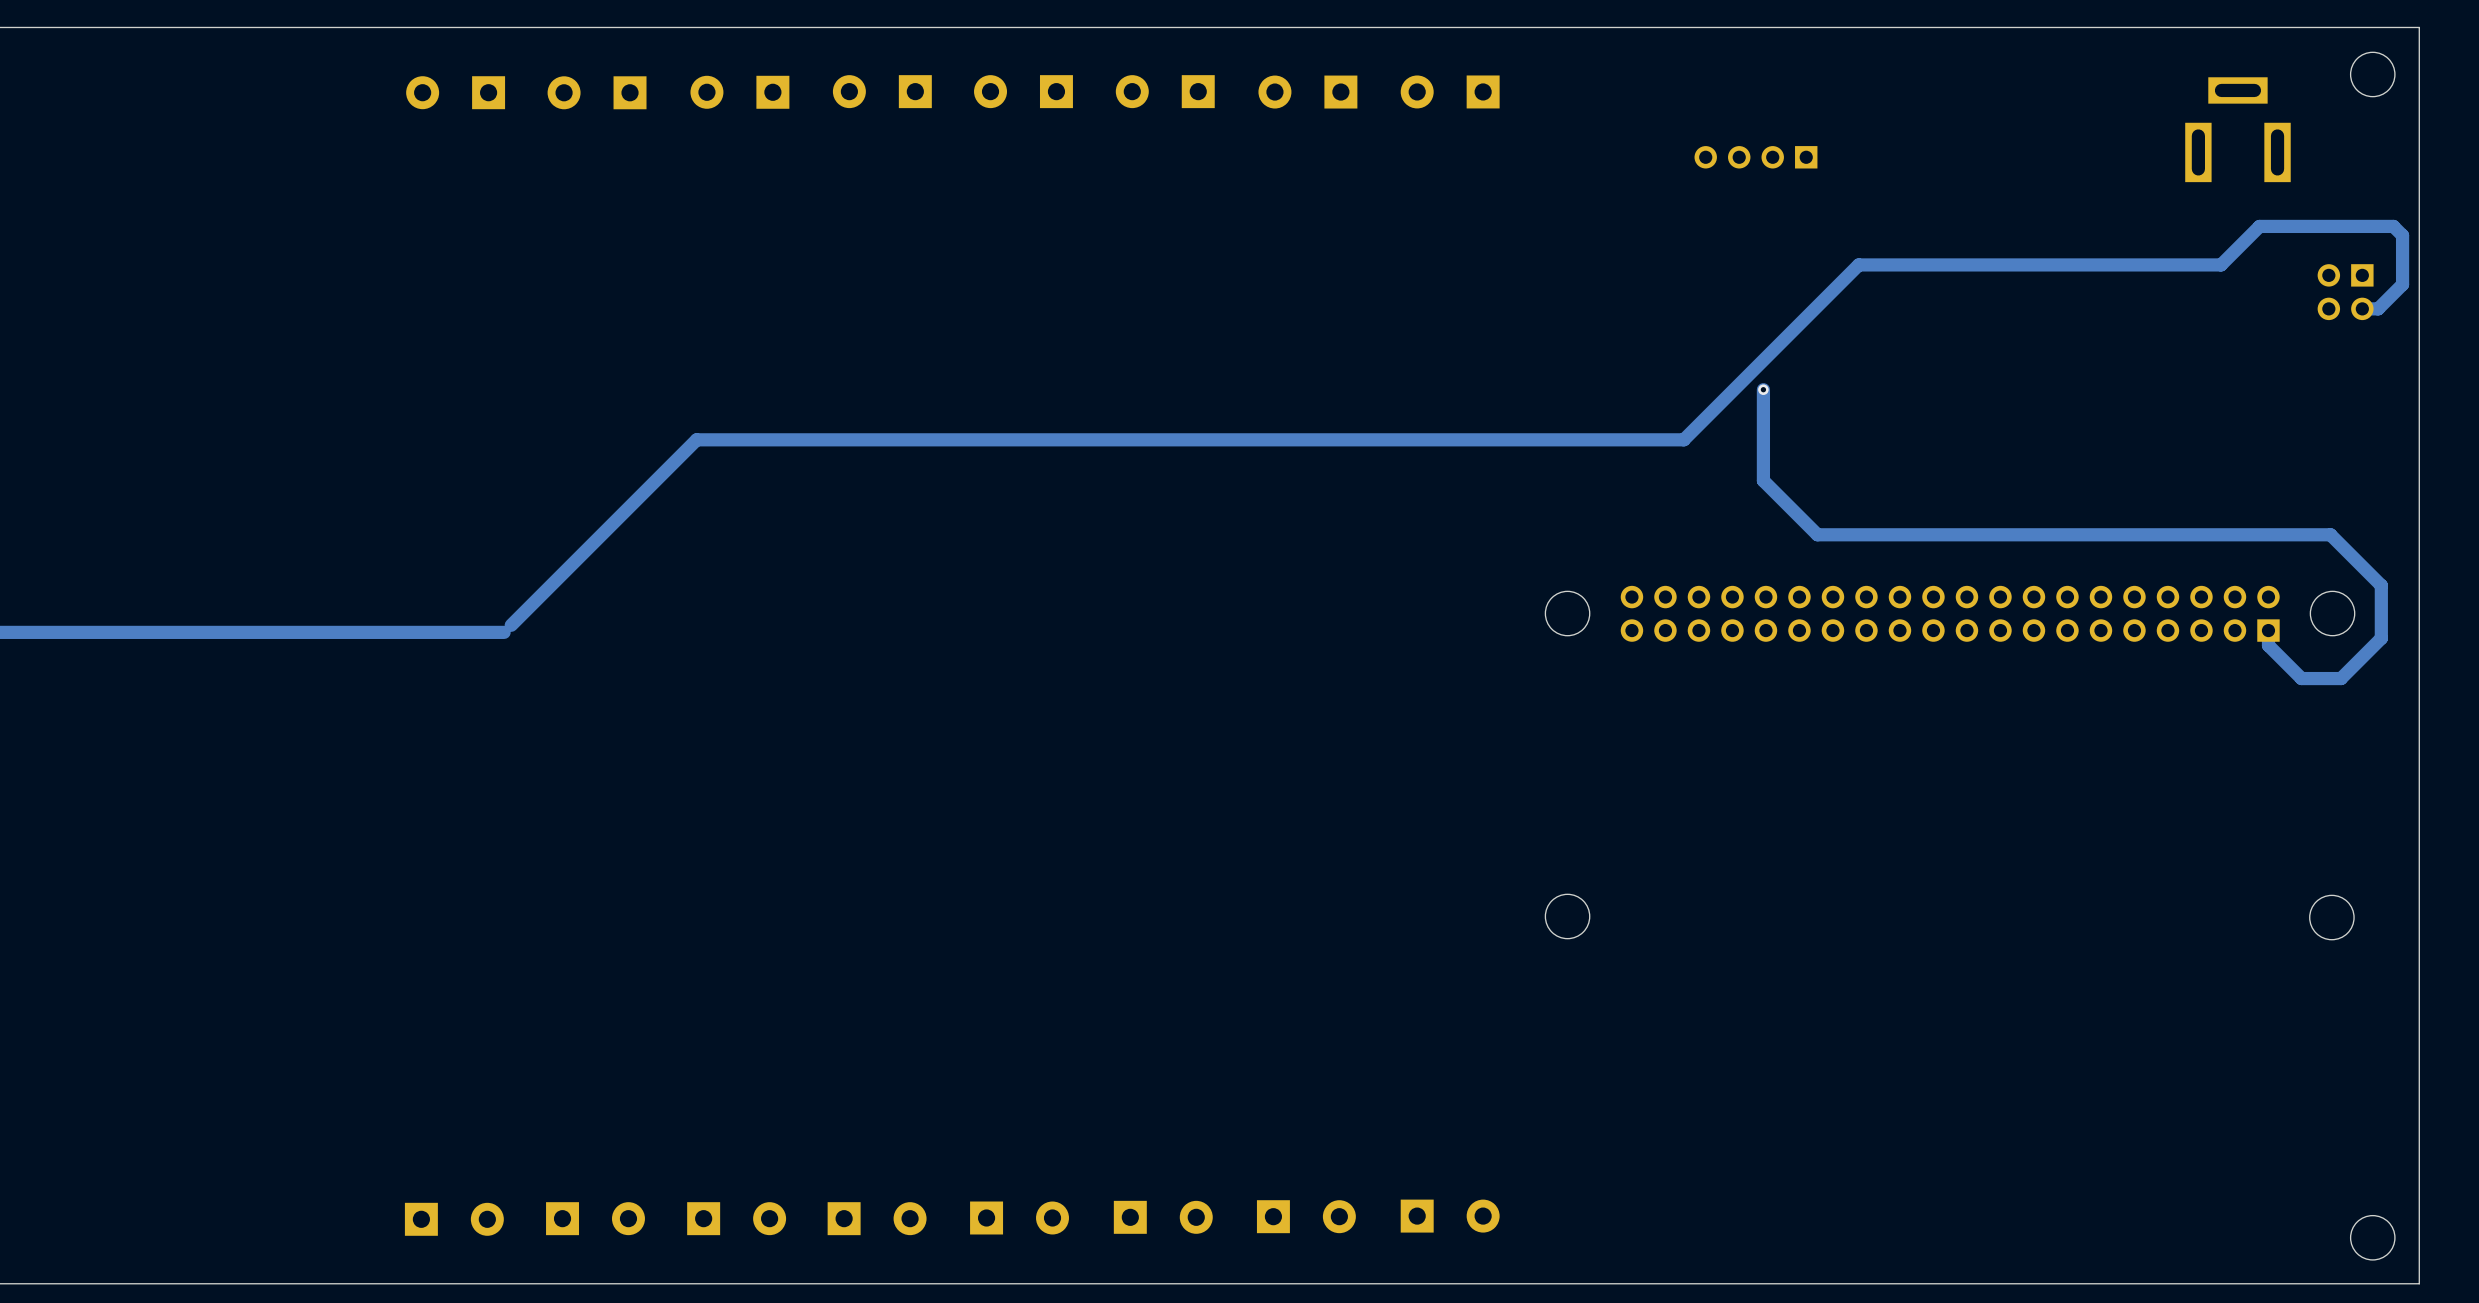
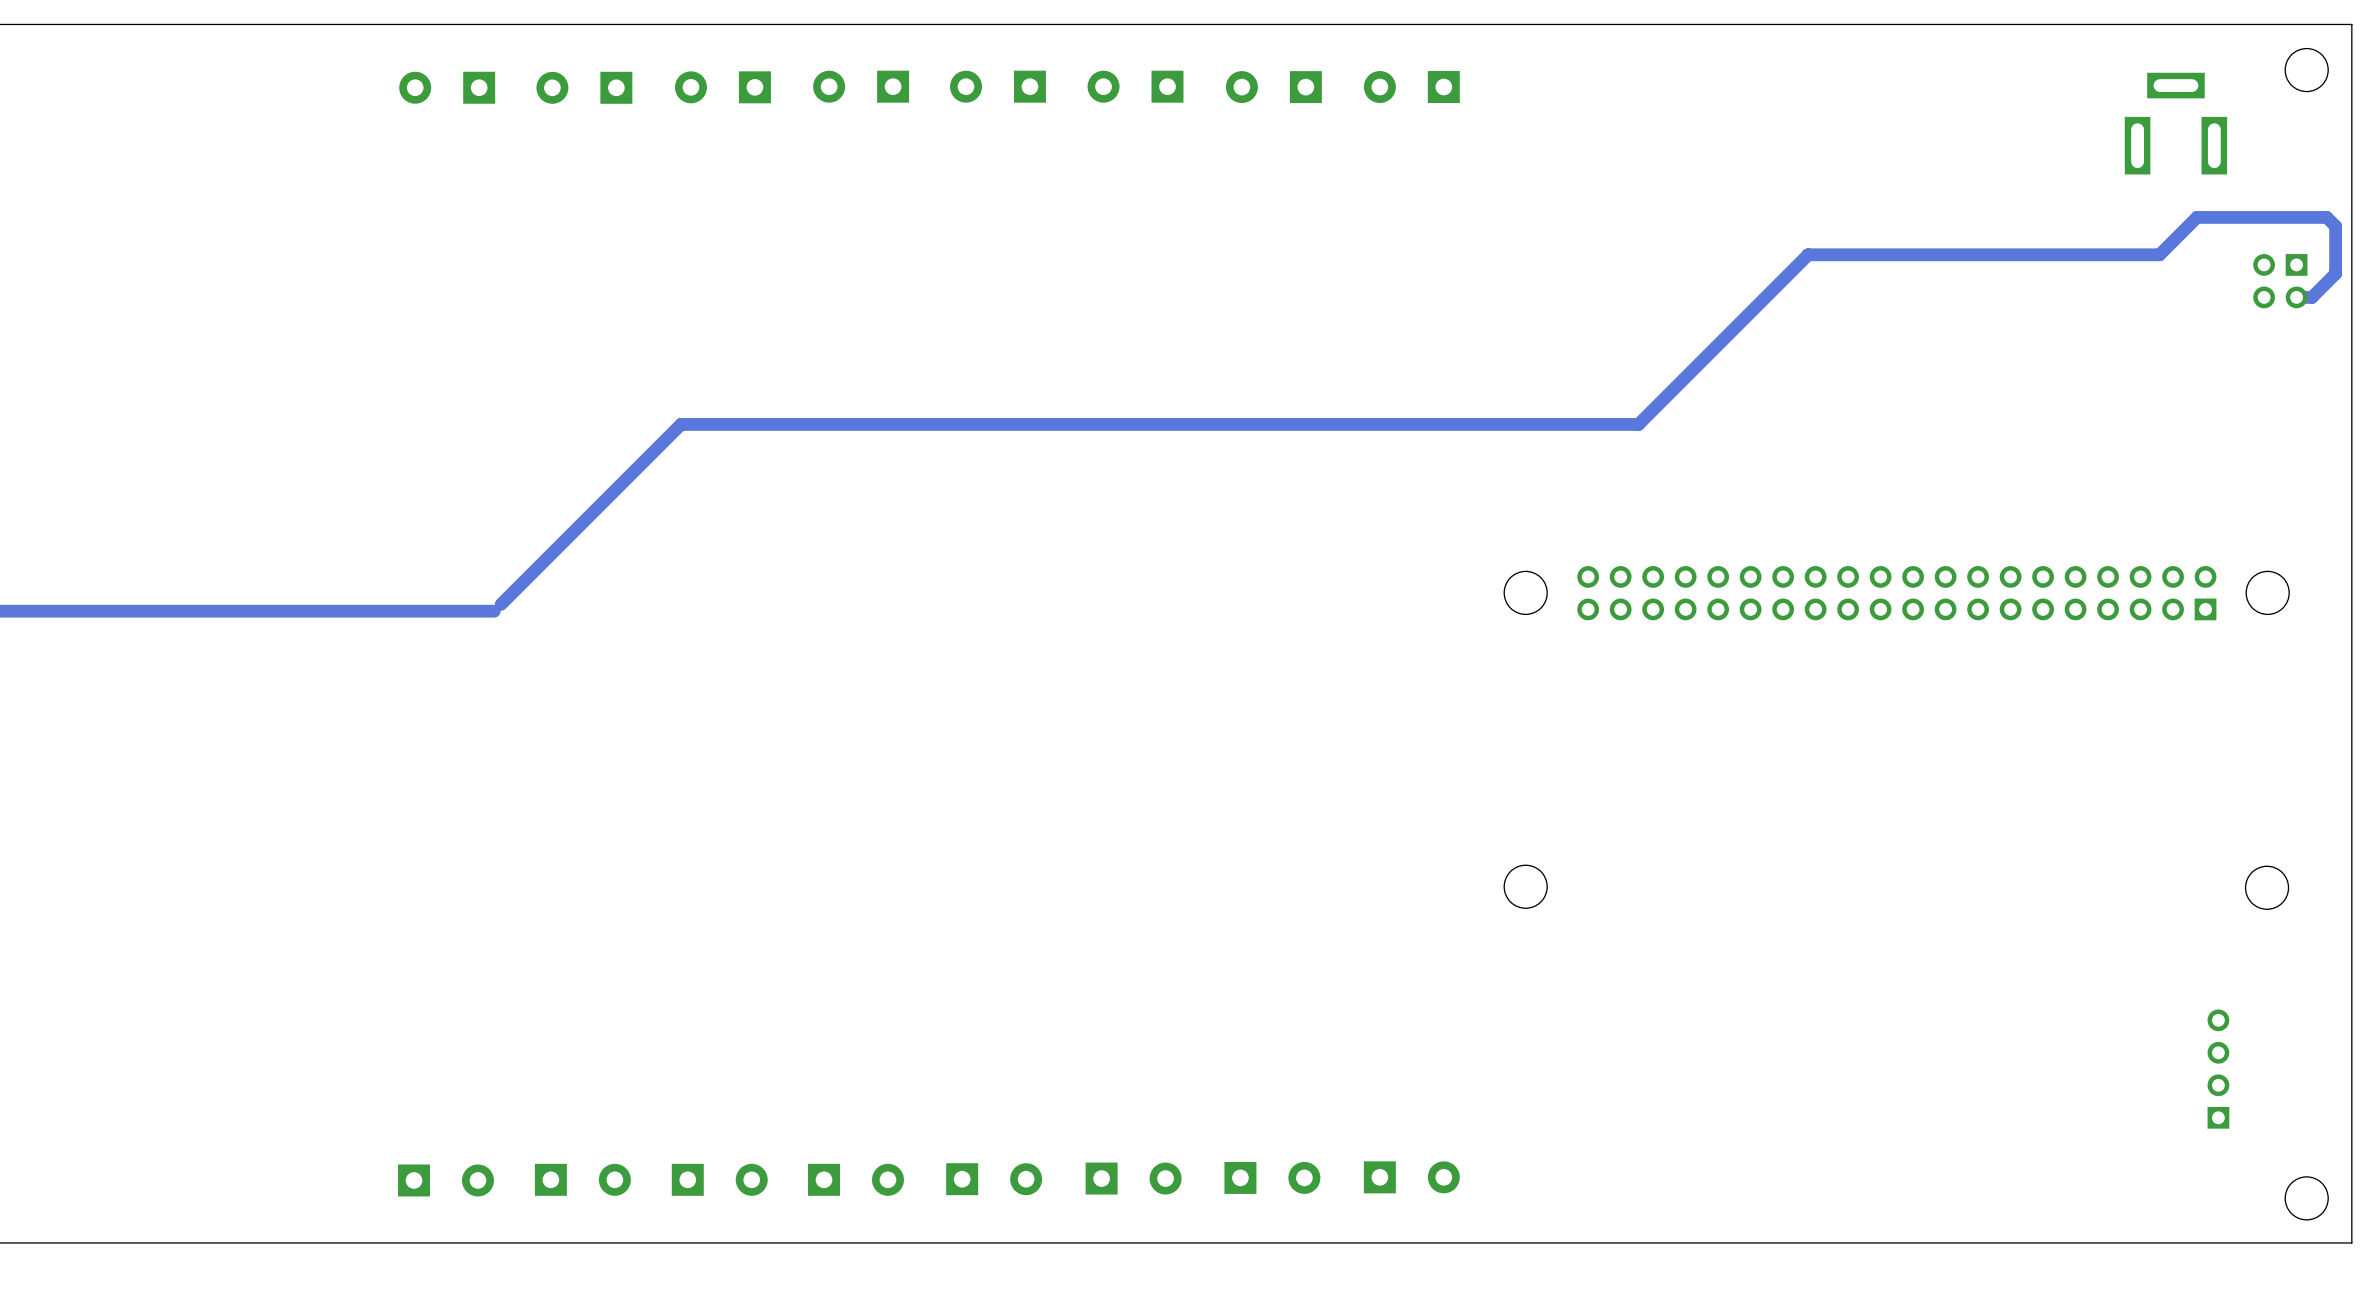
part: (1755, 157) -> none
track: (1763, 389) (1763, 480) (1817, 534) (2330, 534) (2381, 585) (2381, 638) (2341, 678) (2301, 678) (2268, 645) (2268, 630) -> none
via: (1763, 389) -> none
part: none -> (2218, 1069)

